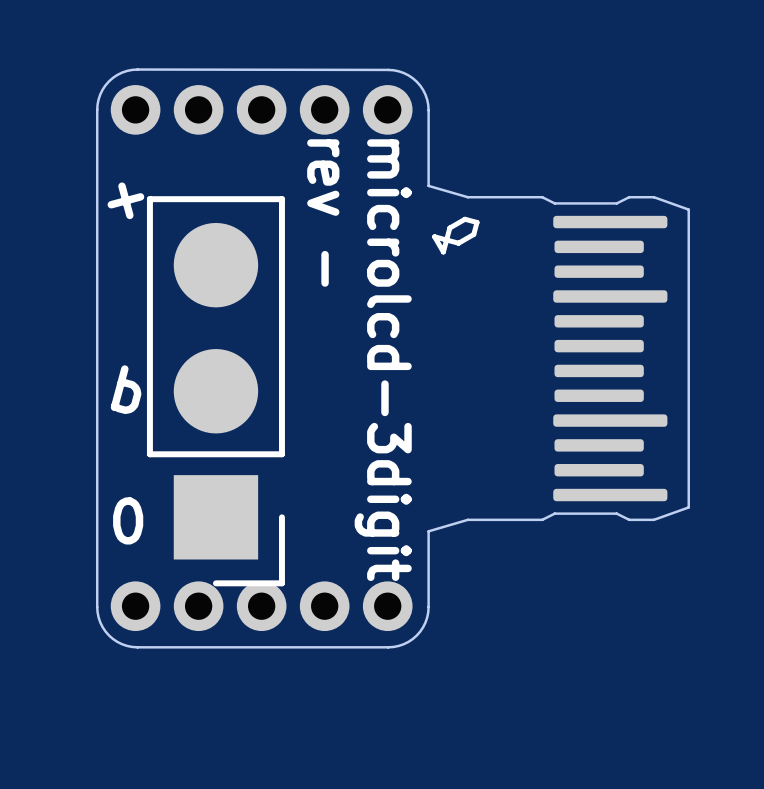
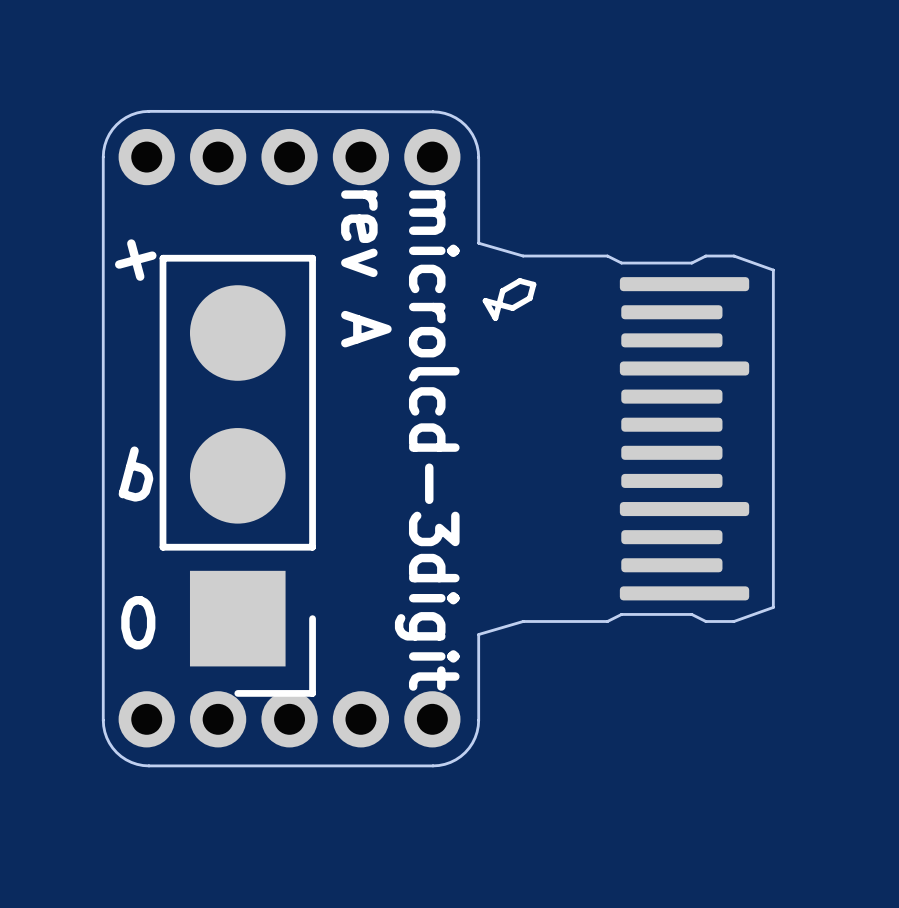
text: rev - (323, 213) -> rev A (366, 268)

